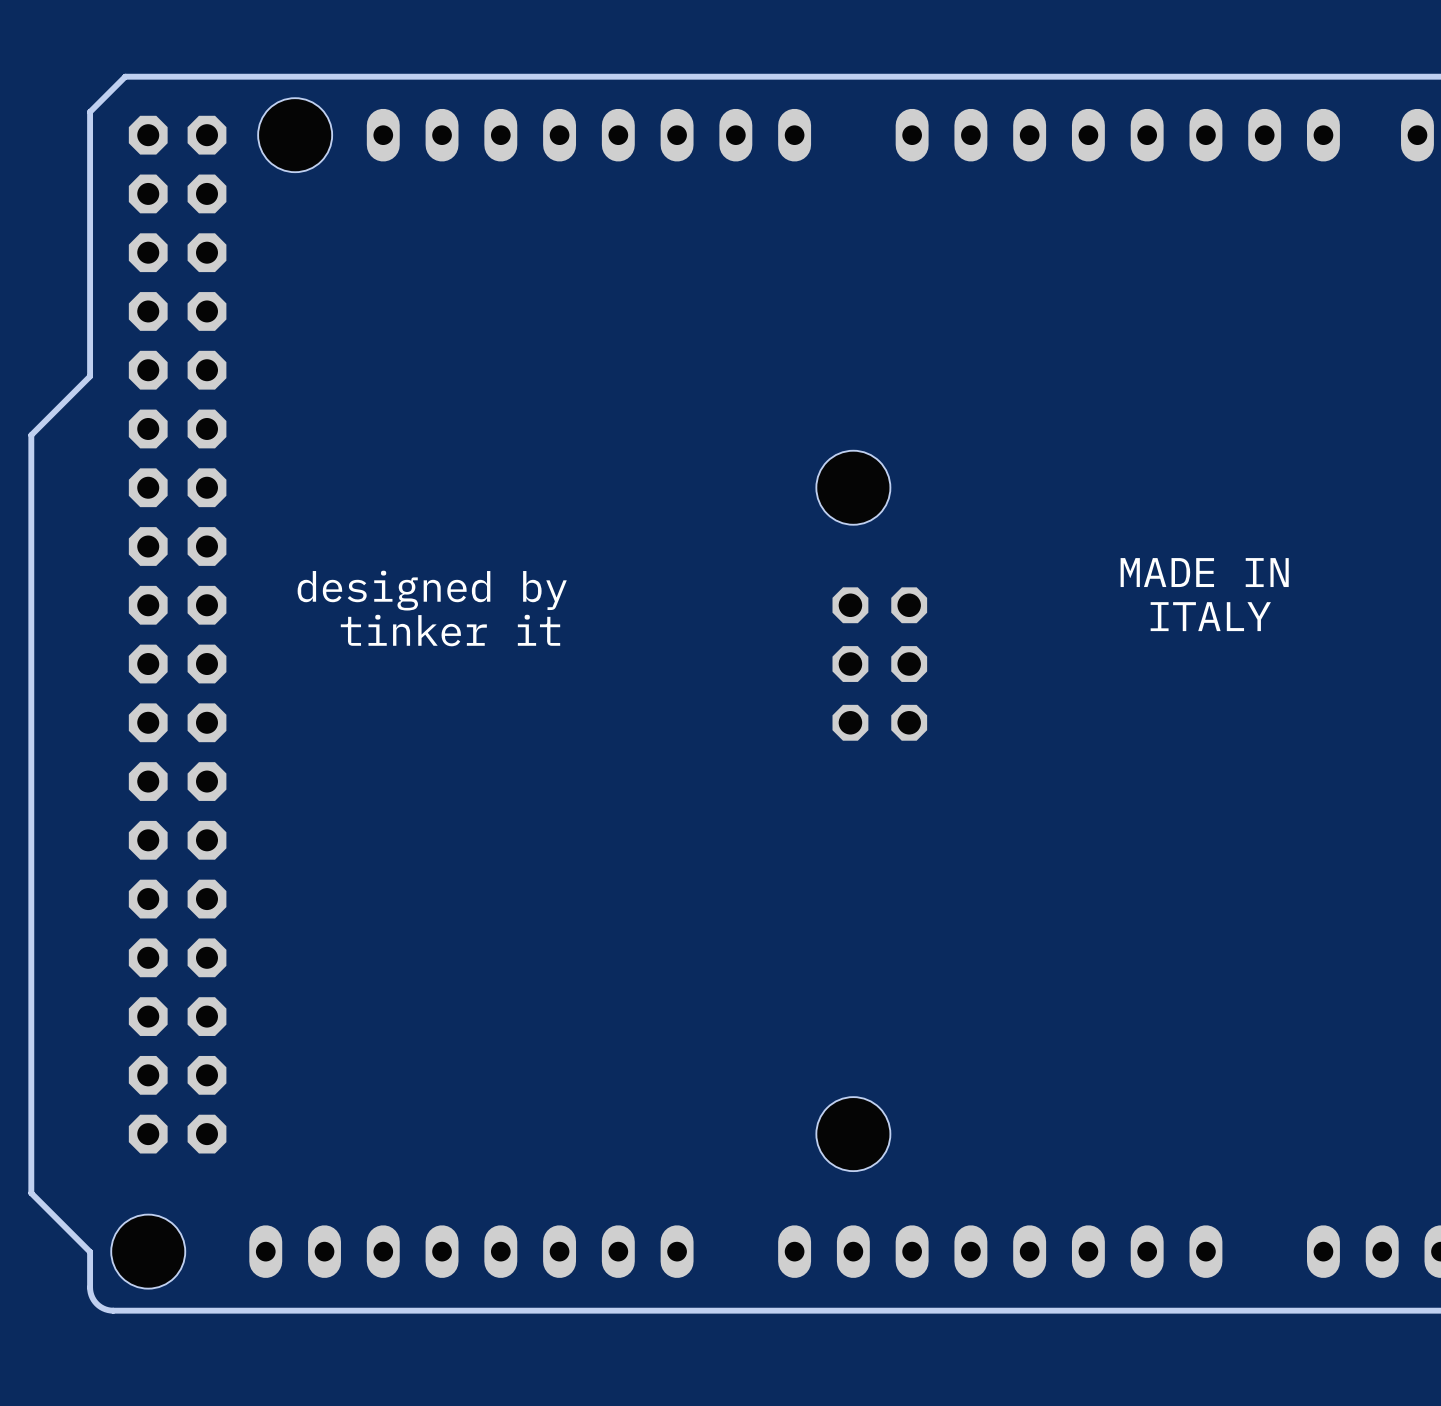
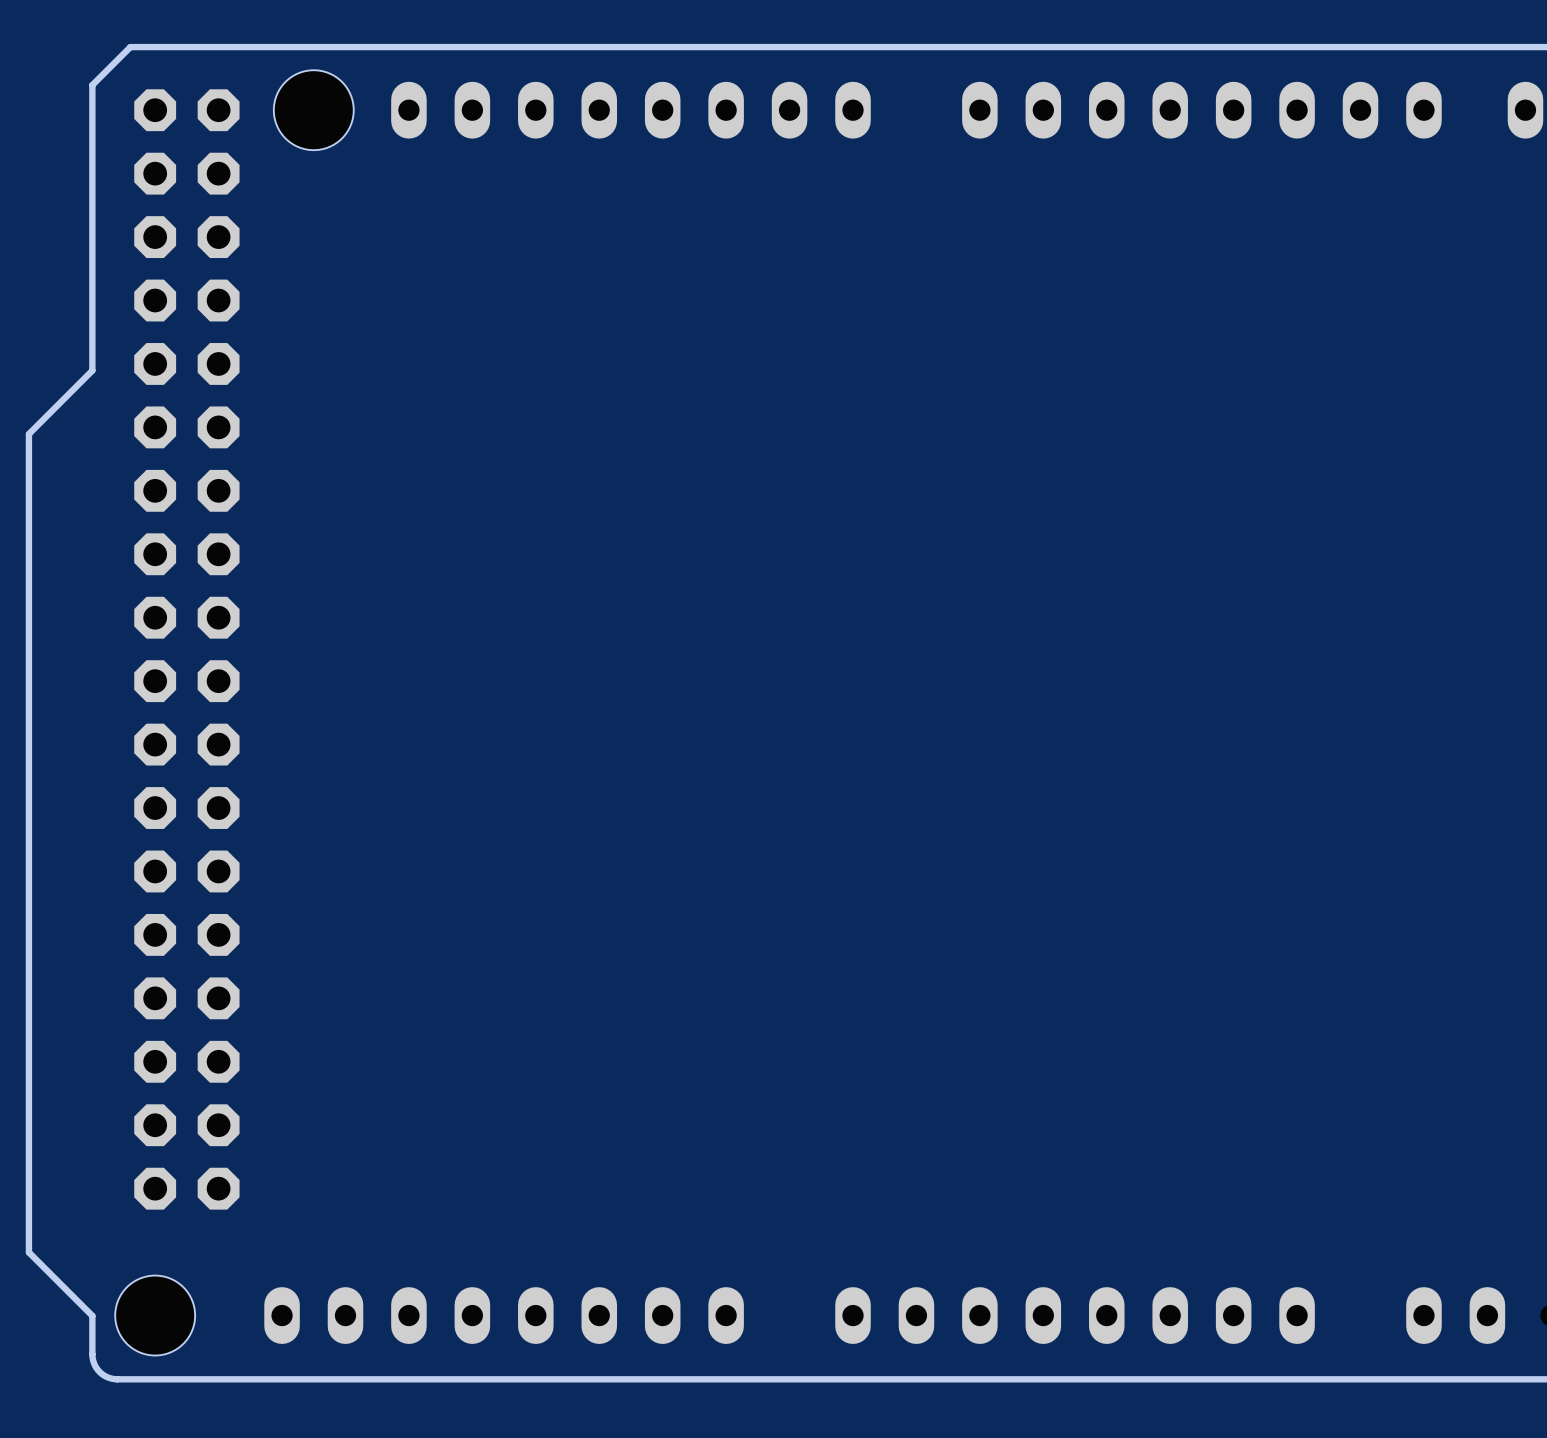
part: (853, 487) -> none
text: MADE IN (1204, 572) -> none
text: designed by (432, 590) -> none
text: ITALY (1210, 616) -> none
text: tinker it (450, 630) -> none
part: (879, 664) -> none
part: (853, 1134) -> none

